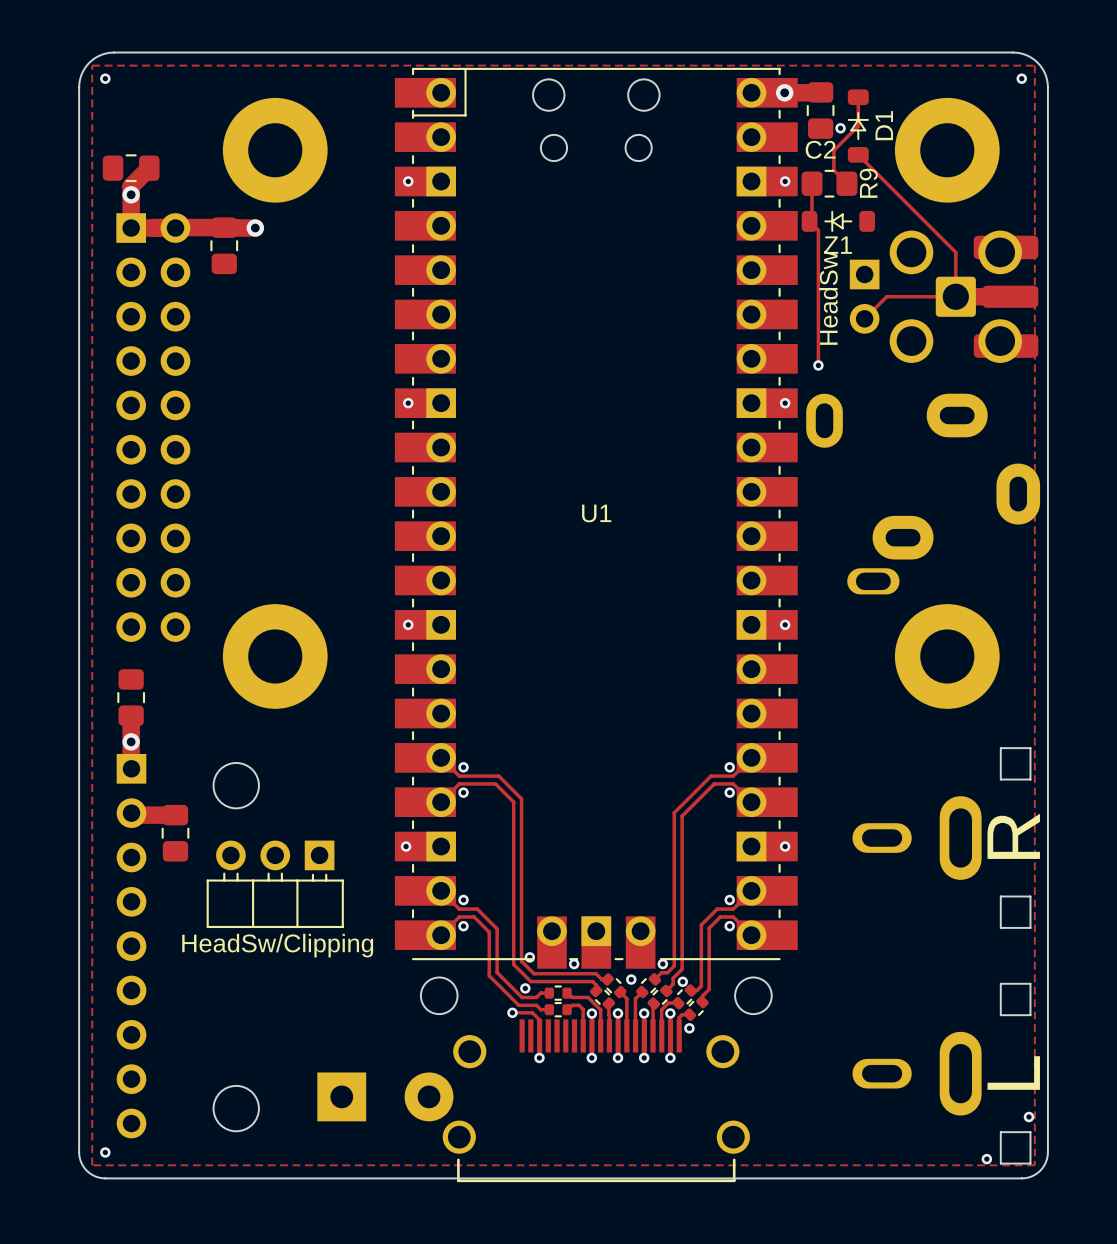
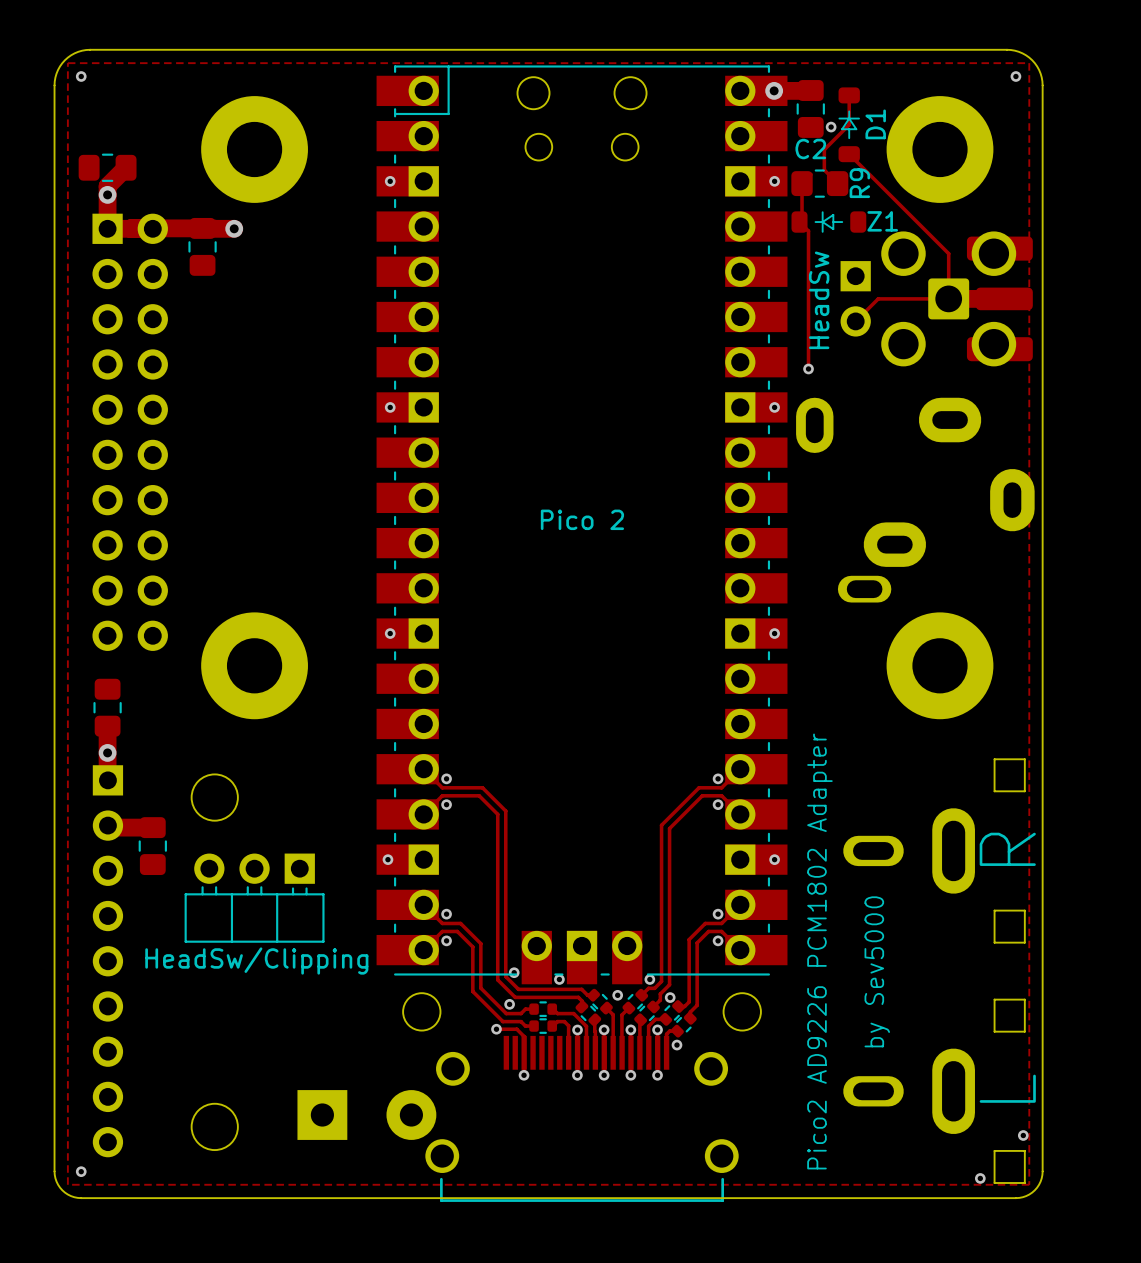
Z1 name position: Z1 (838, 245) -> Z1 (882, 221)
U1 name: U1 (596, 513) -> Pico 2 (582, 519)
text: none -> Pico2 AD9226 PCM1802 Adapter (819, 951)
text: none -> by Sev5000 (877, 971)

